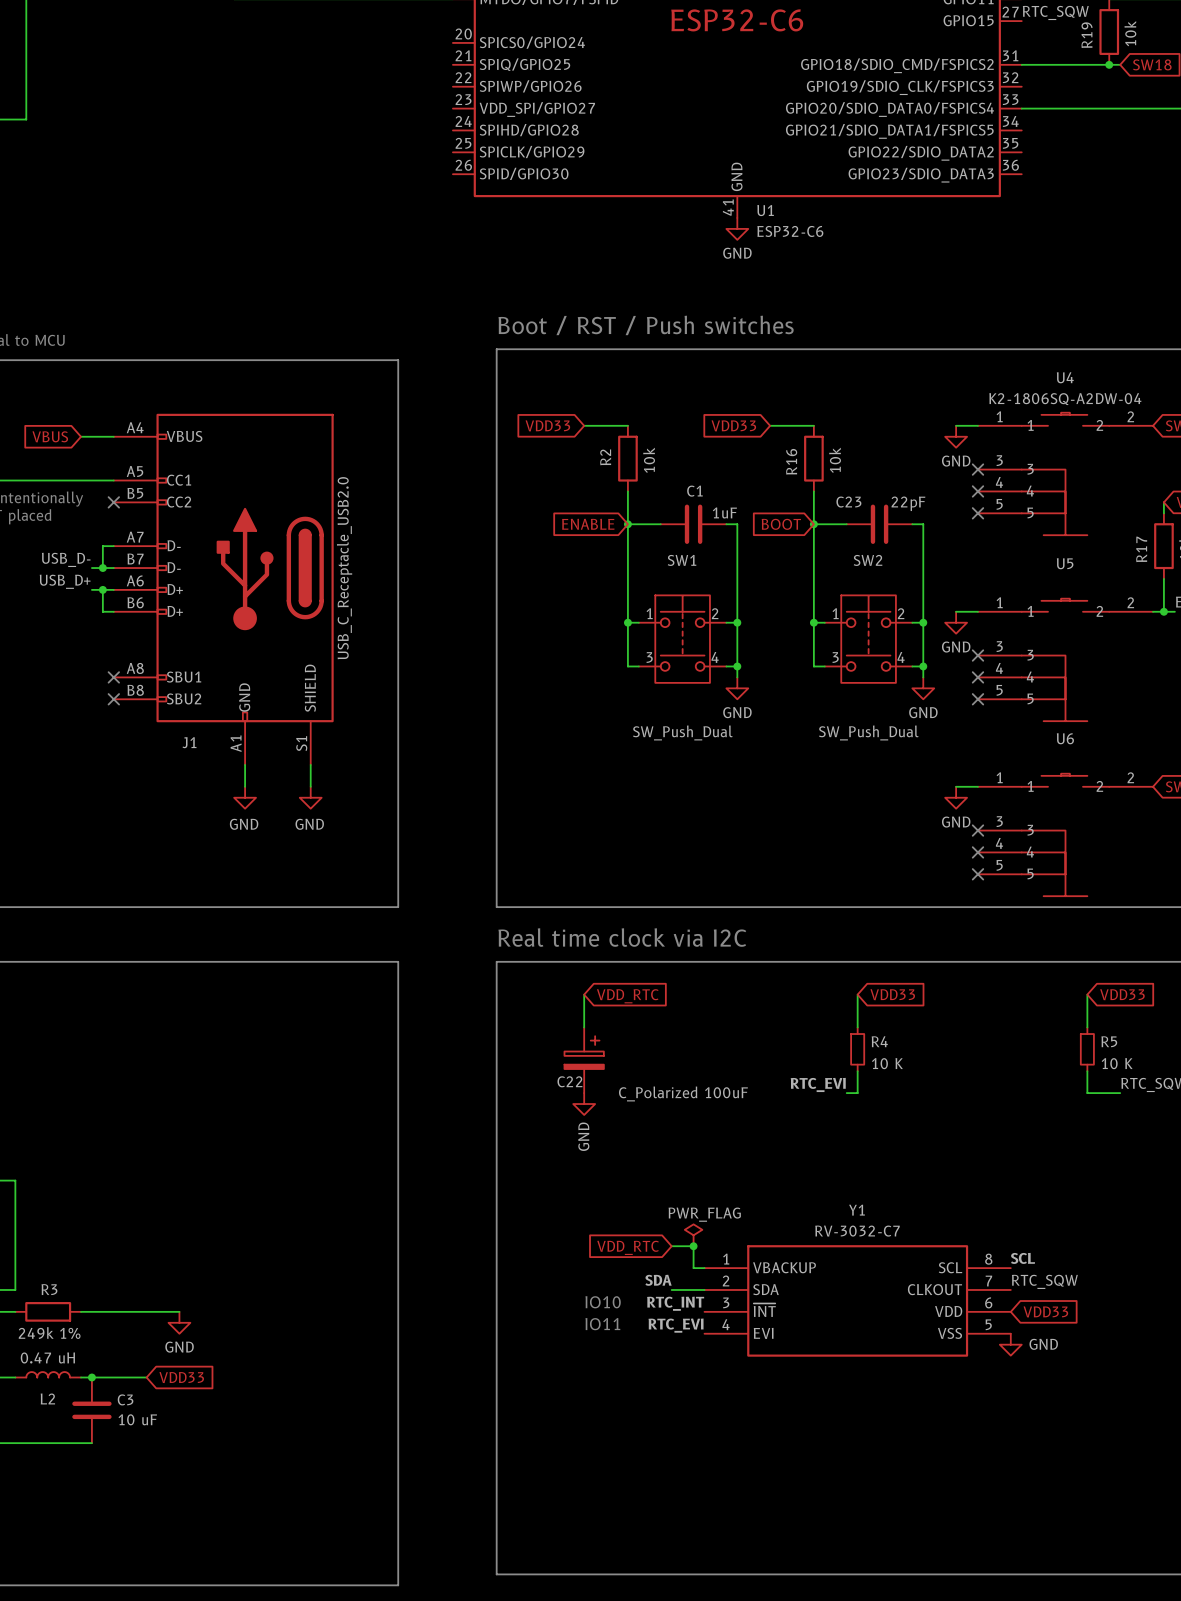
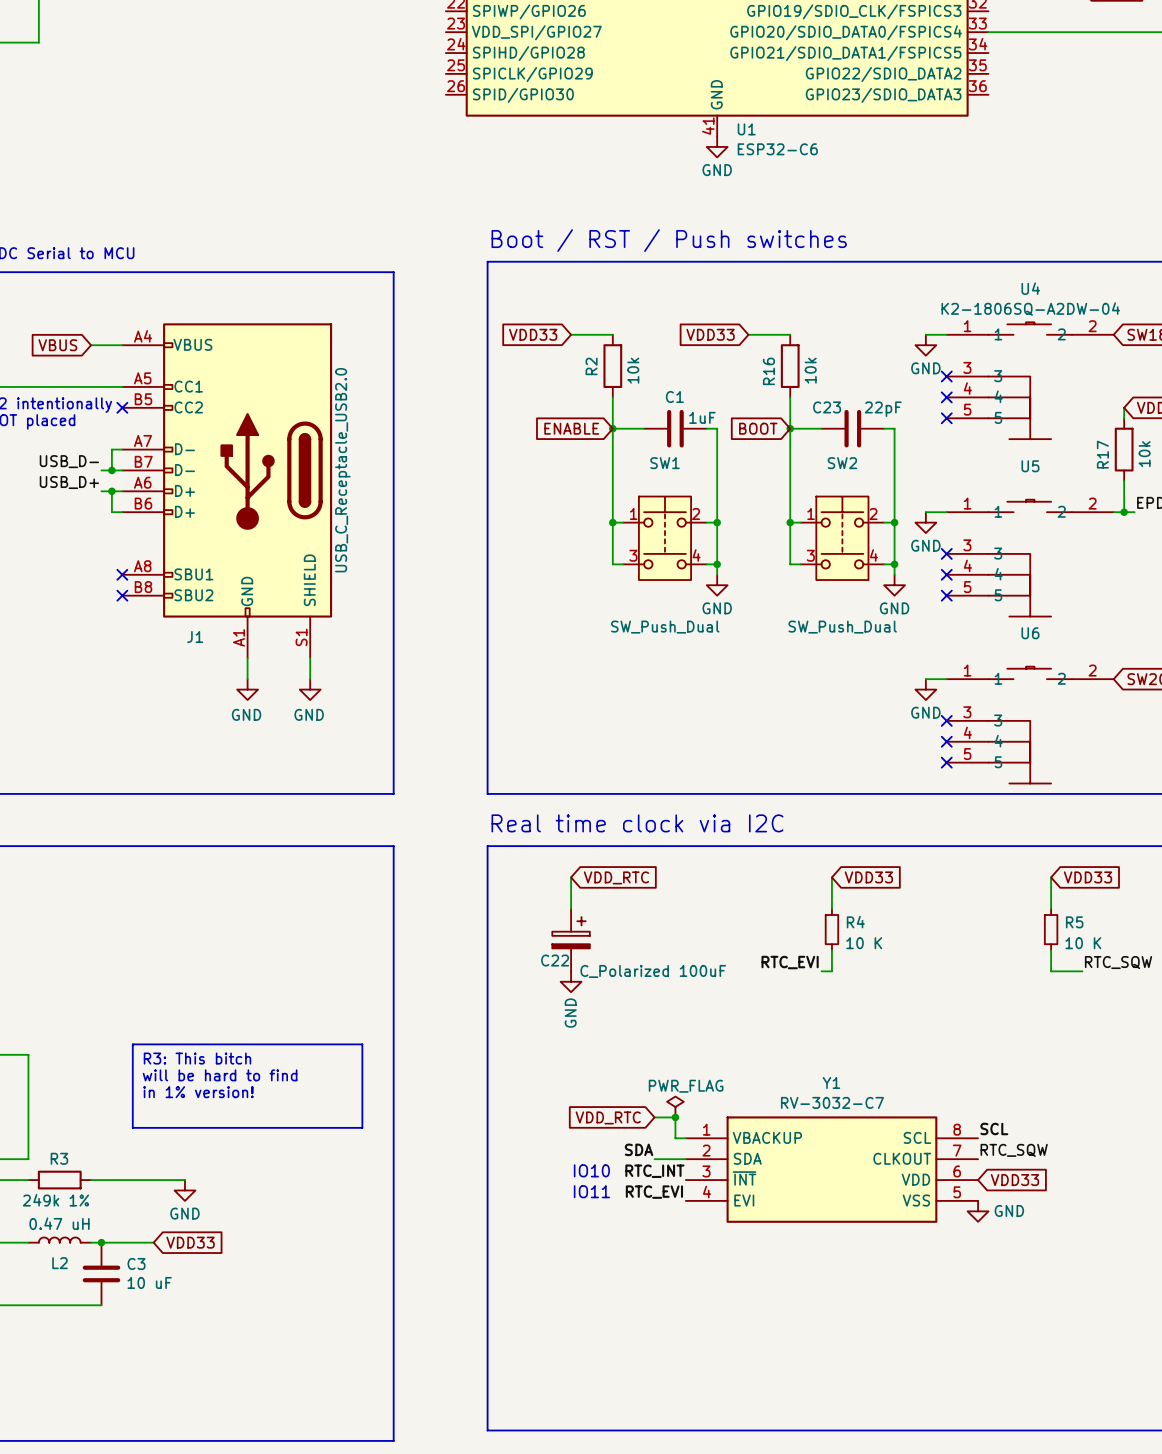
line: none -> (132, 1044) (362, 1044) (362, 1127) (132, 1127) (132, 1044)
text: none -> R3: This bitch (197, 1058)
text: none -> will be hard to find (220, 1075)
text: none -> in 1% version! (198, 1092)

